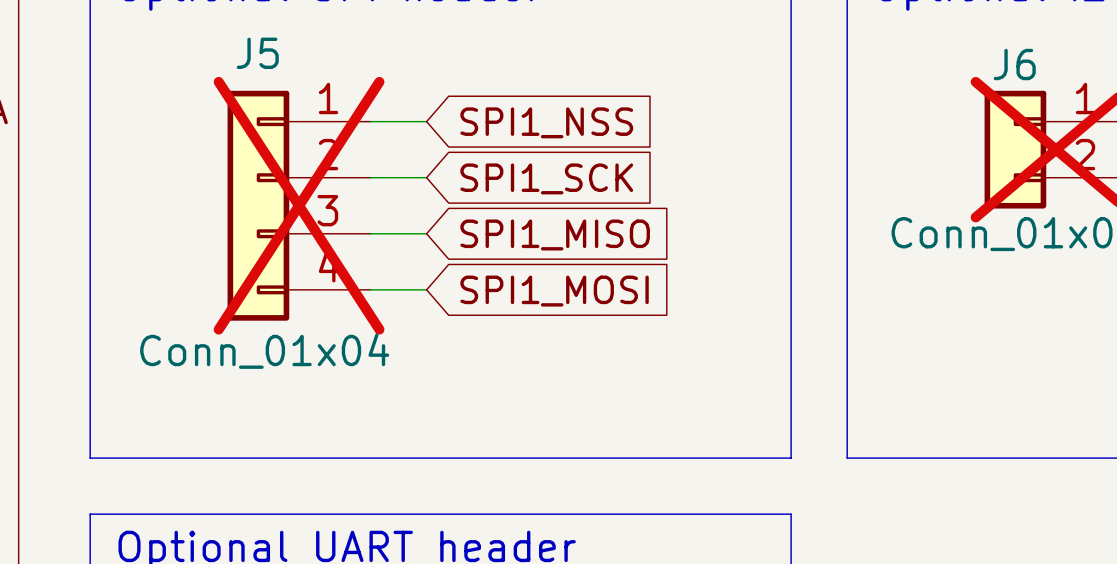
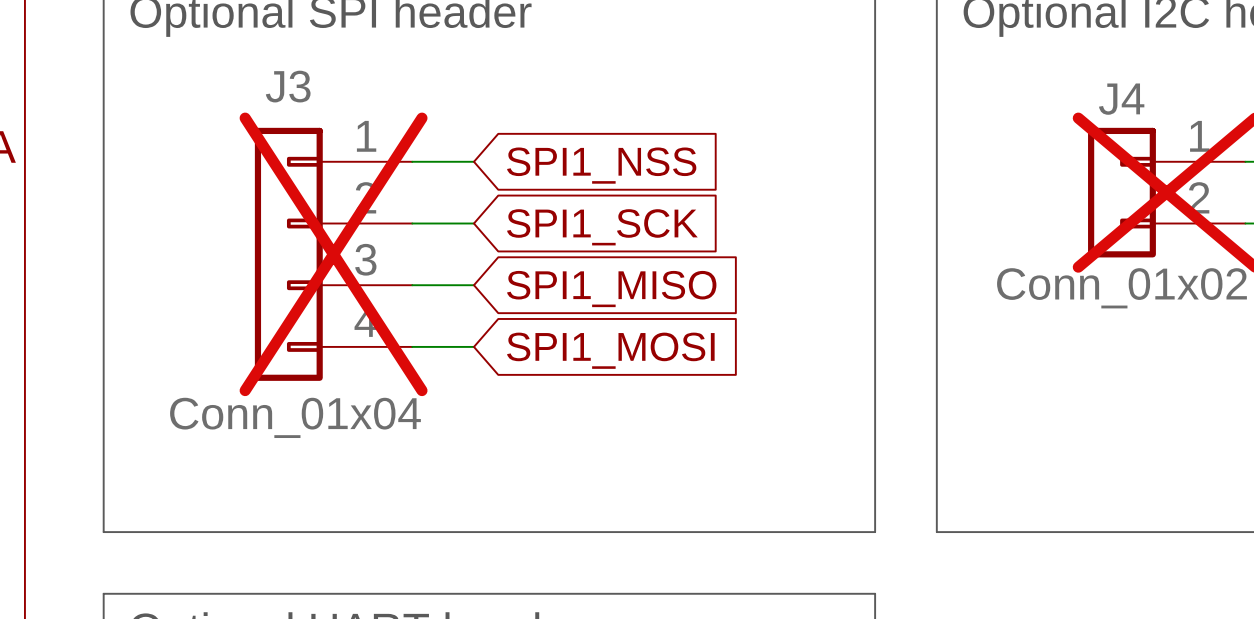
J5 name: J5 (257, 53) -> J3 (288, 86)
J6 name: J6 (1014, 64) -> J4 (1121, 99)

